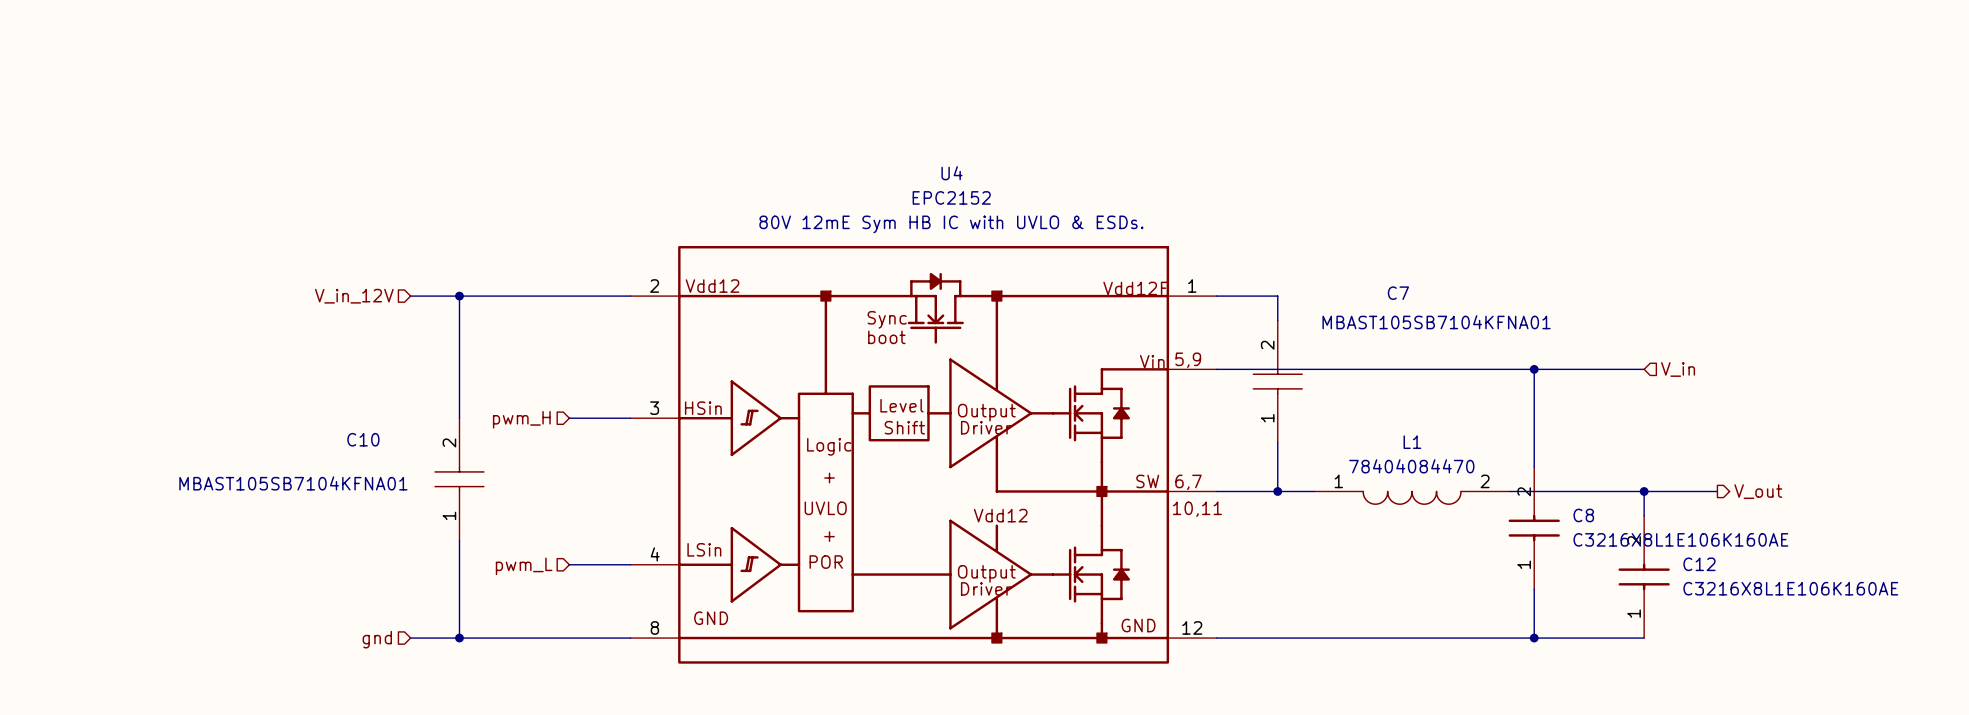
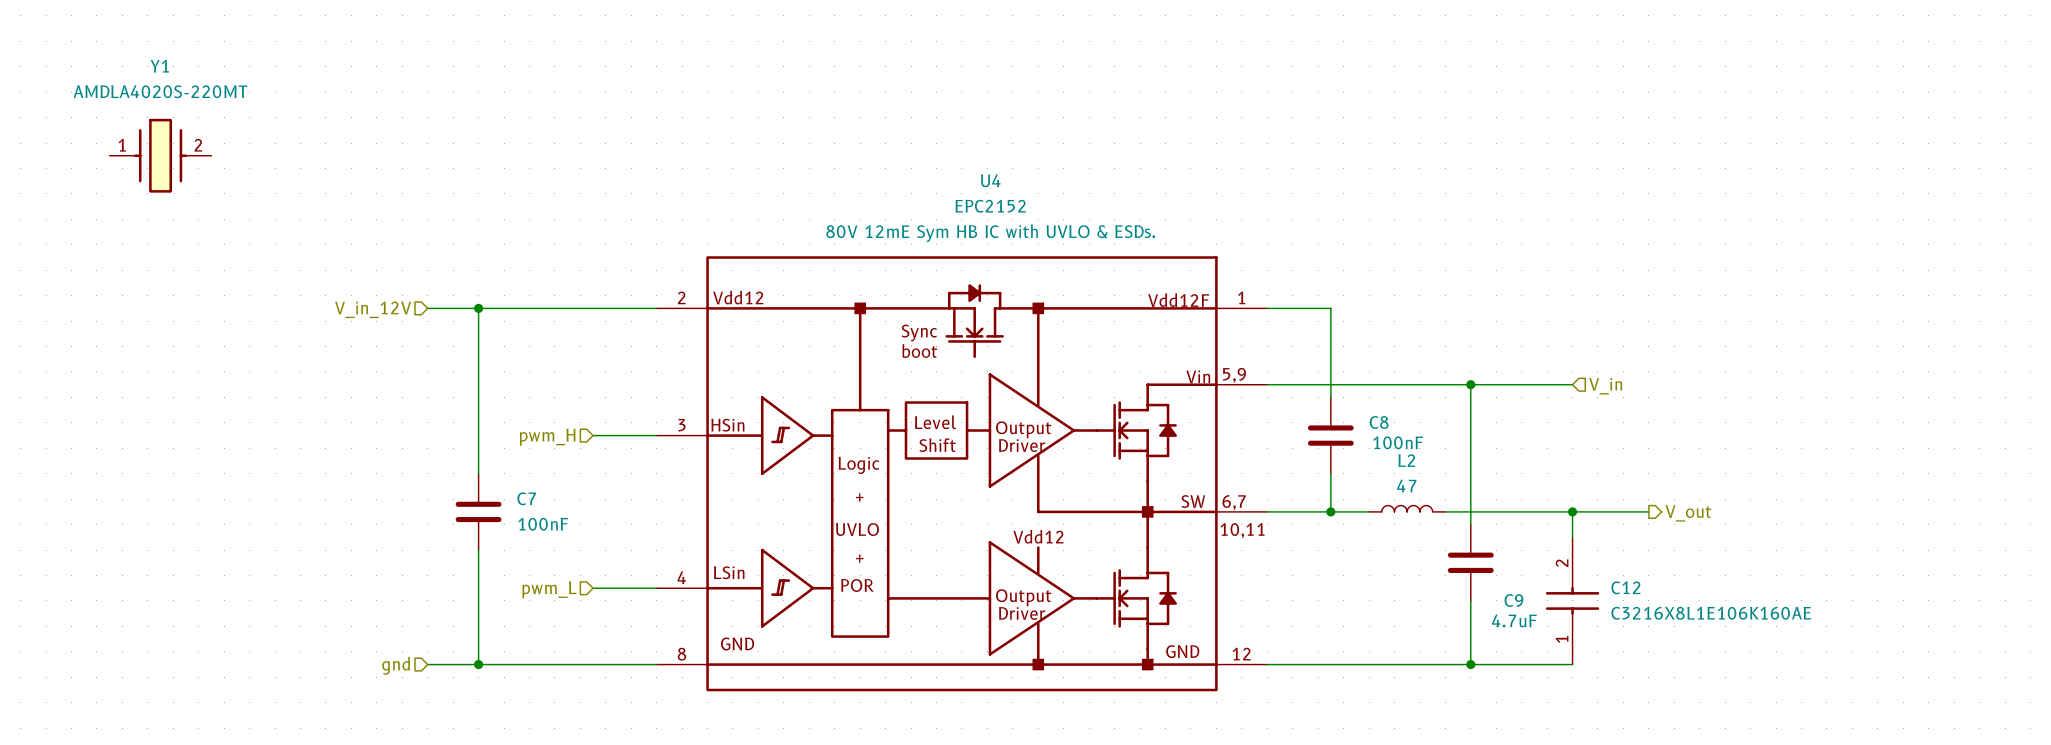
Y1: none -> AMDLA4020S-220MT (160, 155)
C7 name position: C7 (1398, 293) -> C7 (526, 498)
C7 symbol: [1252, 320, 1303, 443] -> [455, 473, 502, 551]
C7 value: MBAST105SB7104KFNA01 (1436, 322) -> 100nF (543, 524)
wire: none -> (1470, 384) (1470, 524)
junction: none -> (1470, 384)
wire: (1509, 369) (1644, 369) -> none
wire: (1534, 369) (1534, 467) -> none
junction: (1534, 369) -> none
hierarchical label position: V_in (1678, 369) -> V_in (1605, 386)
C8 symbol: [1508, 467, 1560, 590] -> [1307, 397, 1354, 474]
C10: MBAST105SB7104KFNA01 (459, 479) -> none
L2: none -> 47 (1407, 508)
wire: none -> (1445, 511) (1572, 511) (1572, 537)
junction: none -> (1572, 511)
wire: (1583, 491) (1717, 491) -> none
wire: (1644, 491) (1644, 515) -> none
junction: (1644, 491) -> none
hierarchical label position: V_out (1758, 491) -> V_out (1688, 513)
L1: 78404084470 (1412, 497) -> none
C8 value: C3216X8L1E106K160AE (1680, 539) -> 100nF (1398, 442)
C9: none -> 4.7uF (1470, 562)
wire: none -> (1470, 600) (1470, 664)
C12 position: (1644, 576) -> (1572, 600)
wire: (1534, 589) (1534, 638) -> none
junction: none -> (1470, 664)
wire: (1509, 638) (1644, 638) -> none
junction: (1534, 638) -> none

